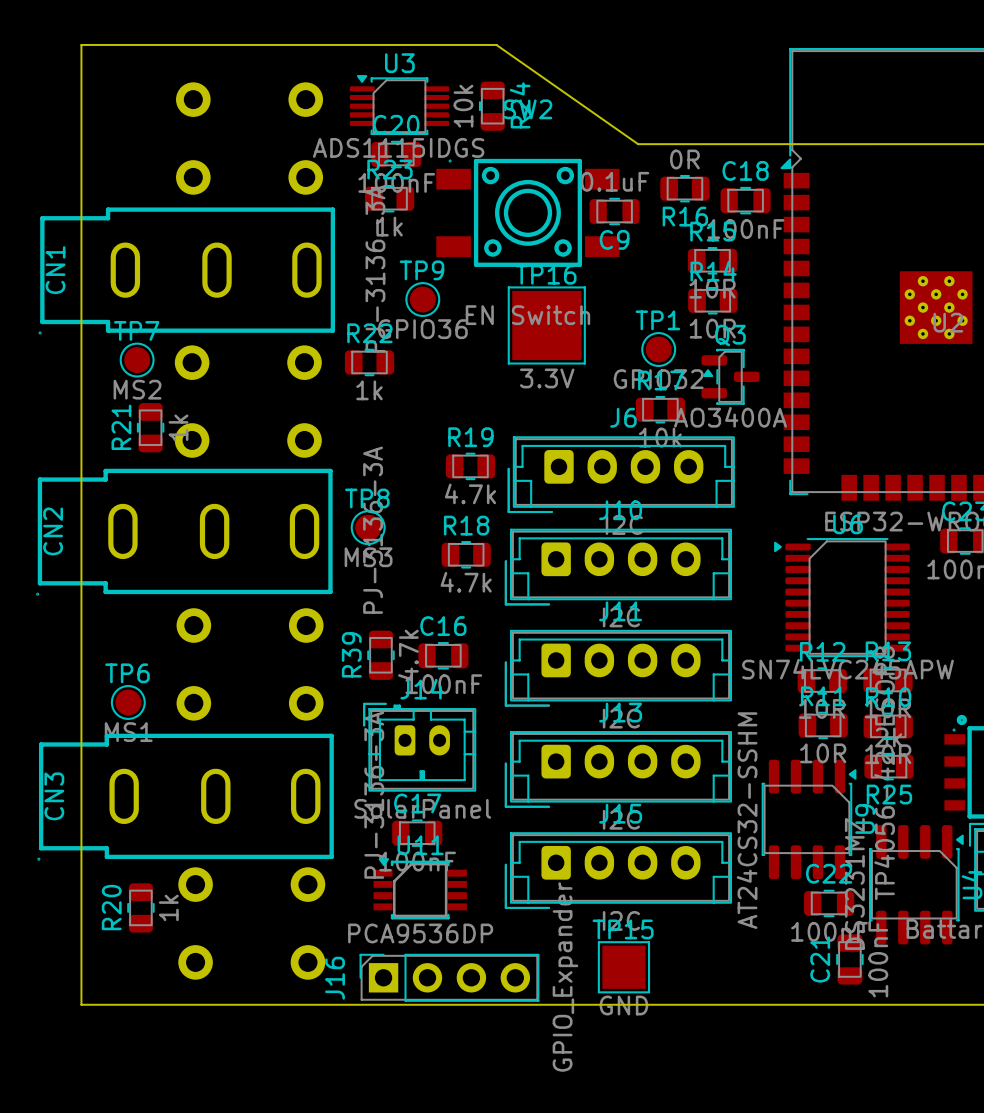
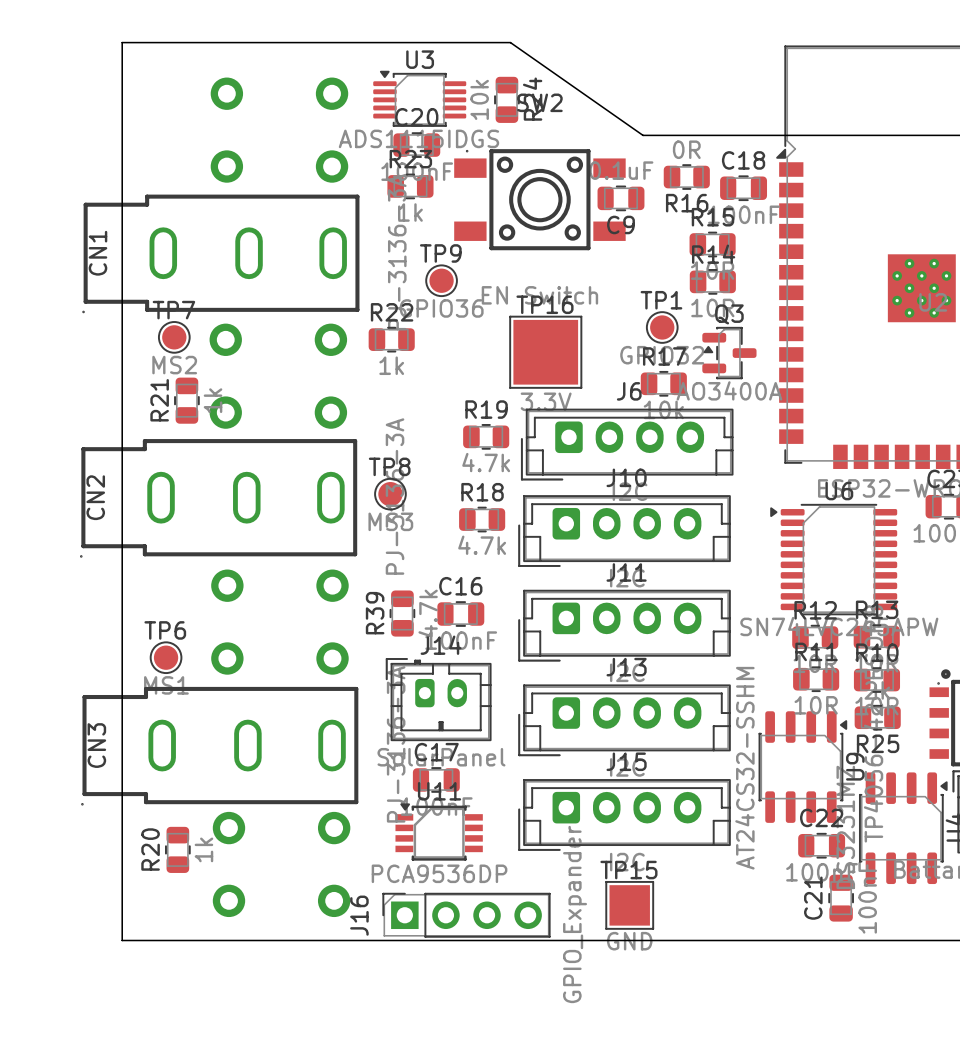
TP16 position: (546, 325) -> (545, 352)

